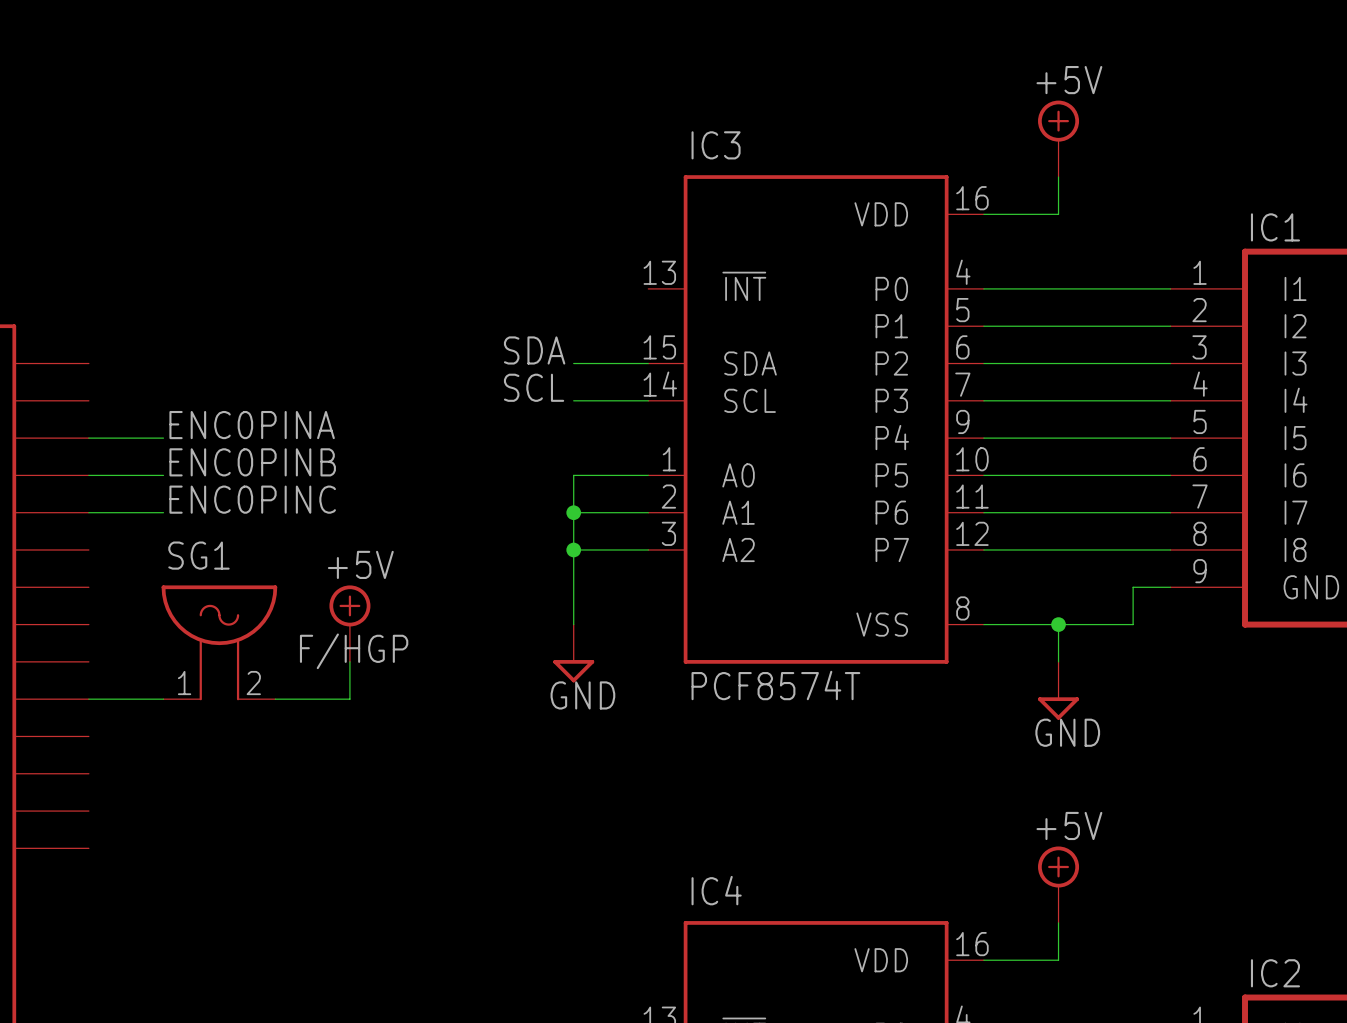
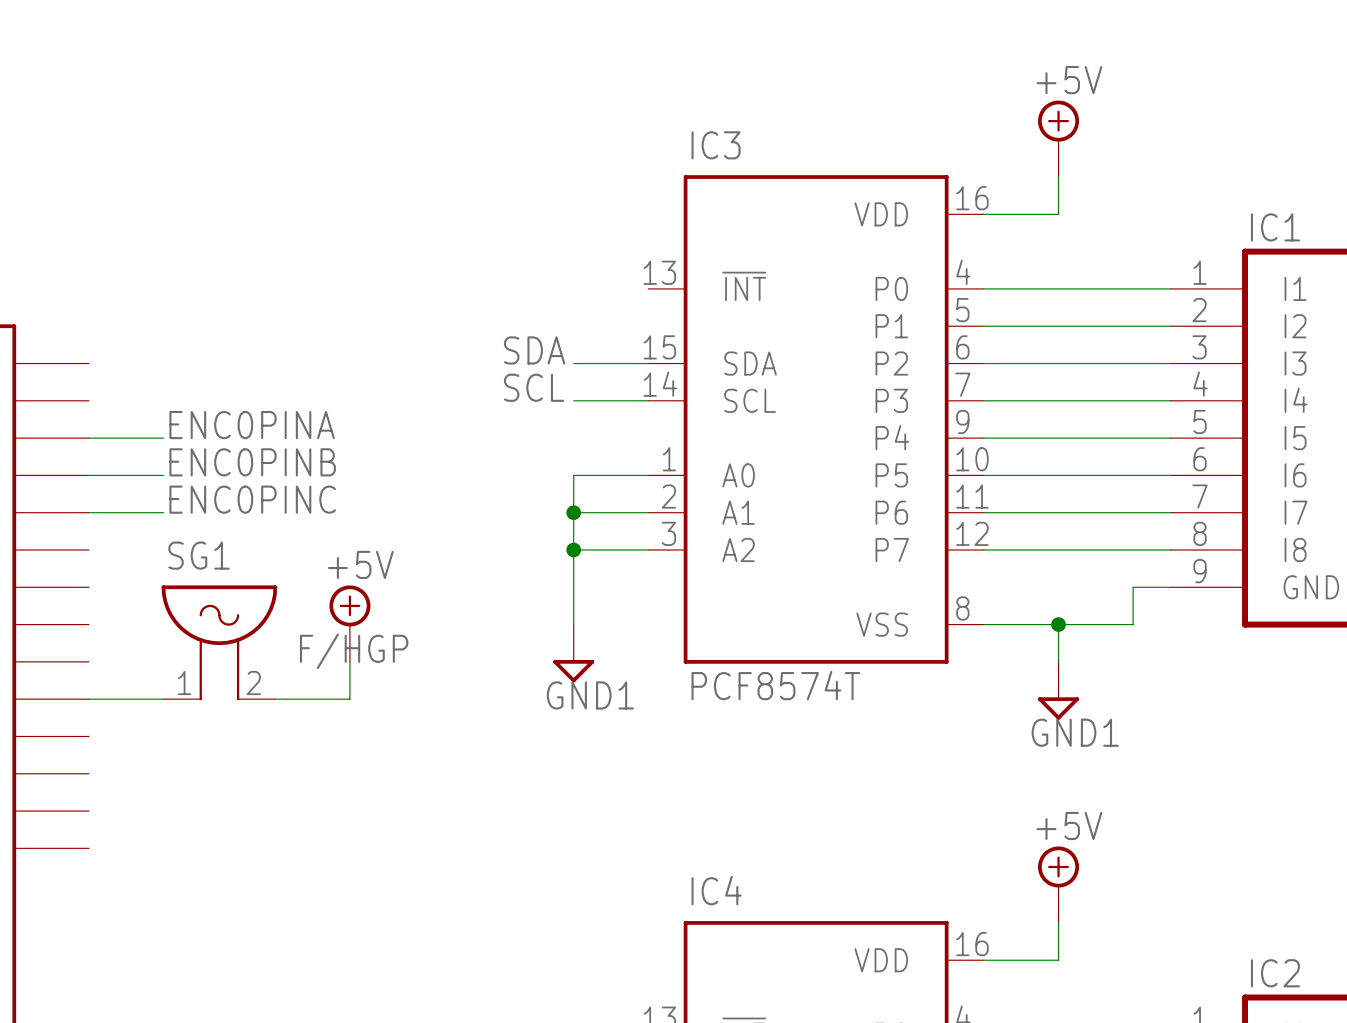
power symbol: GND (573, 653) -> GND1 (573, 653)
power symbol: GND (1058, 690) -> GND1 (1058, 690)

